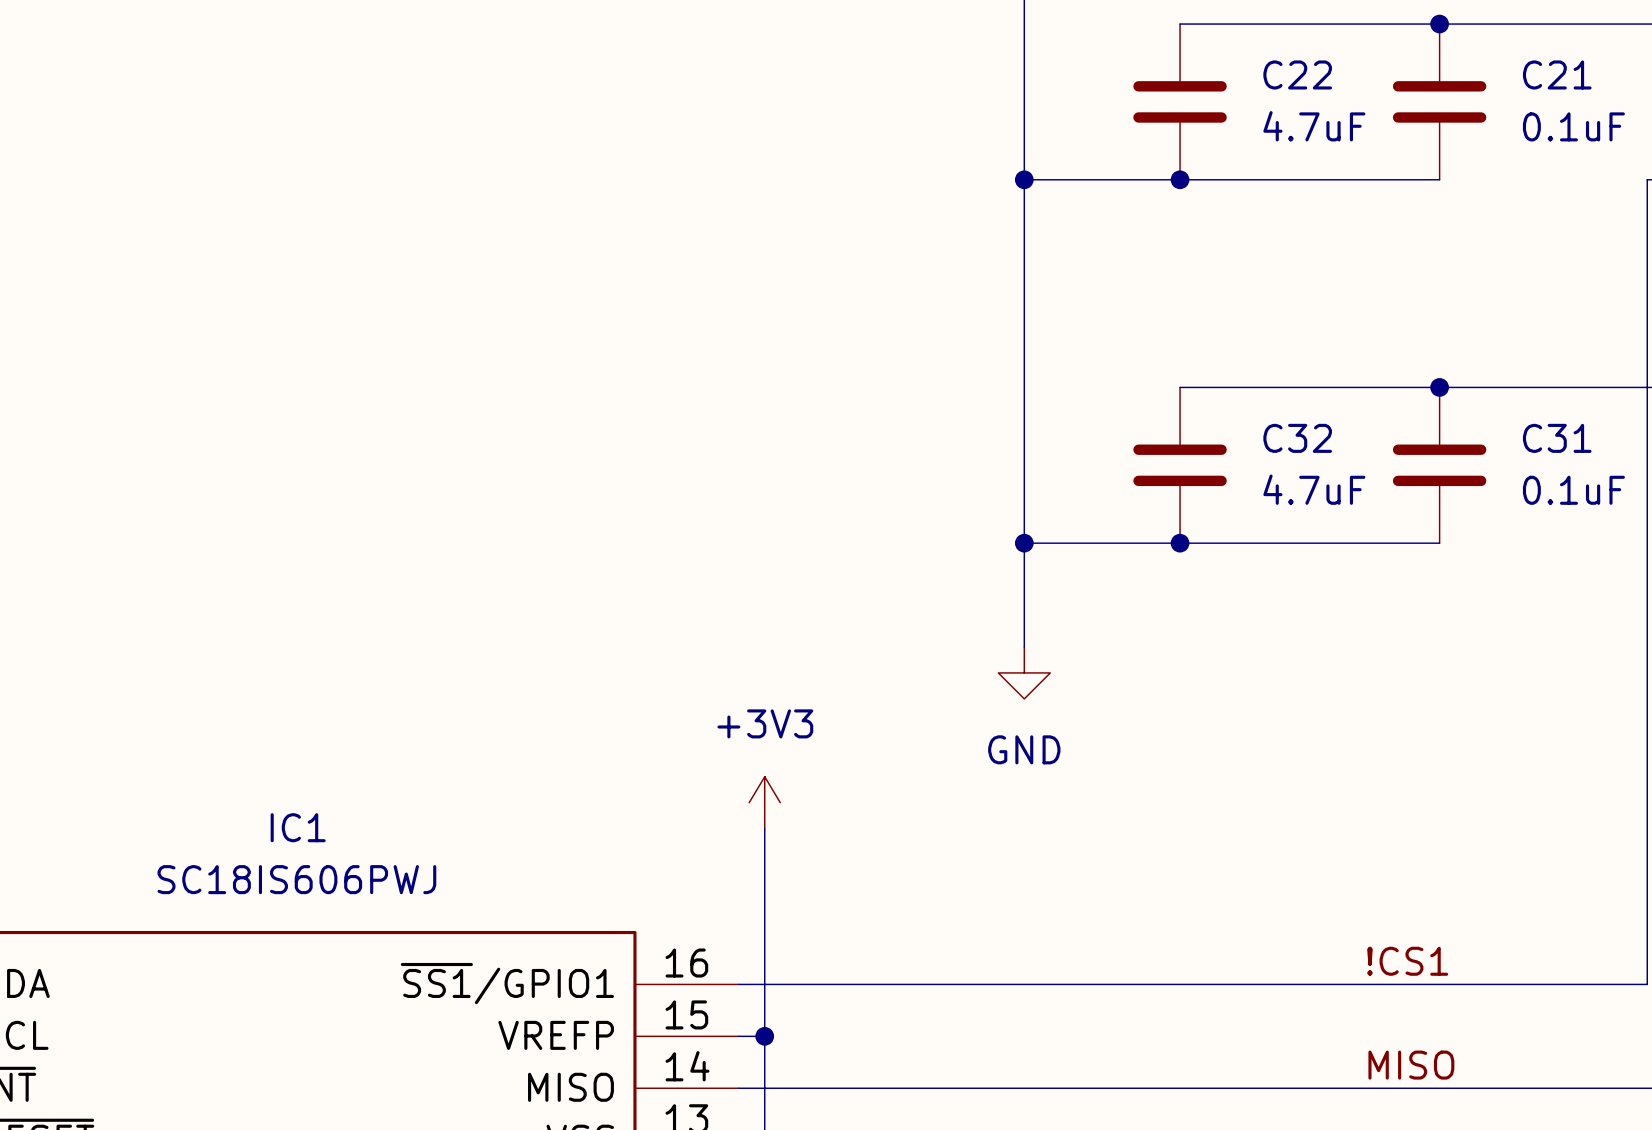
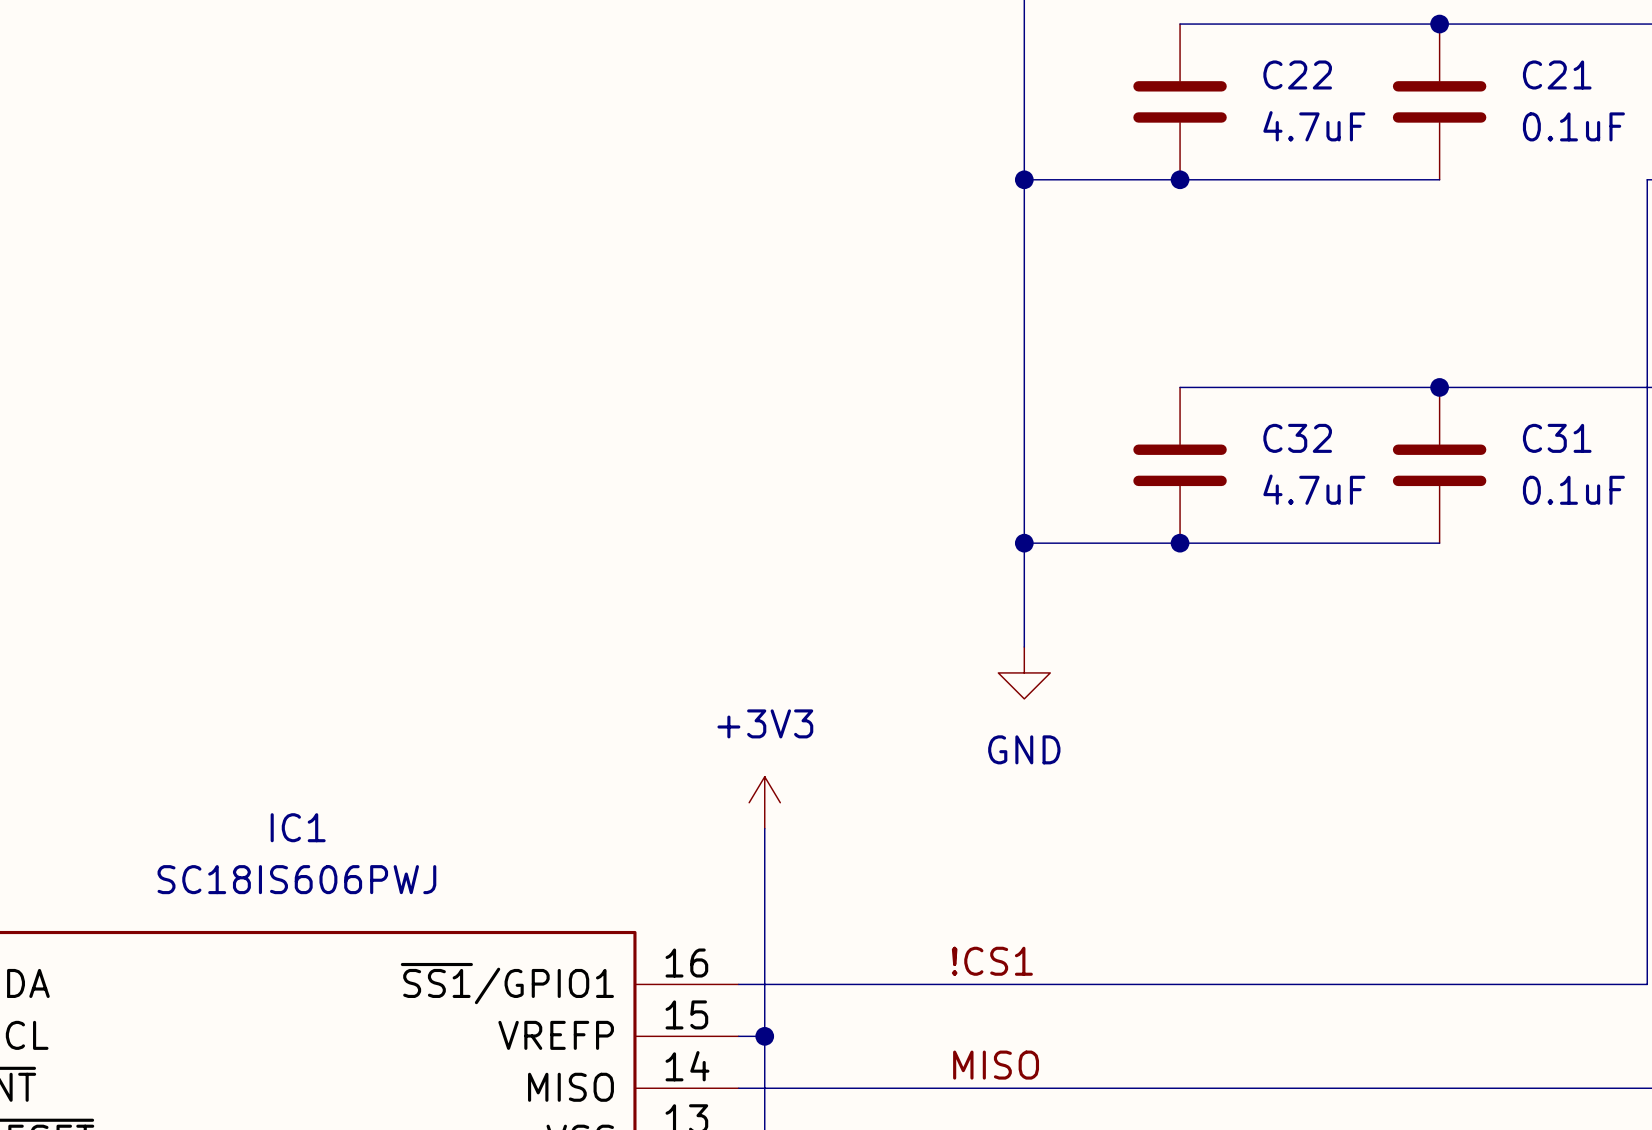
label position: !CS1 (1407, 961) -> !CS1 (992, 961)
label position: MISO (1411, 1065) -> MISO (996, 1065)

